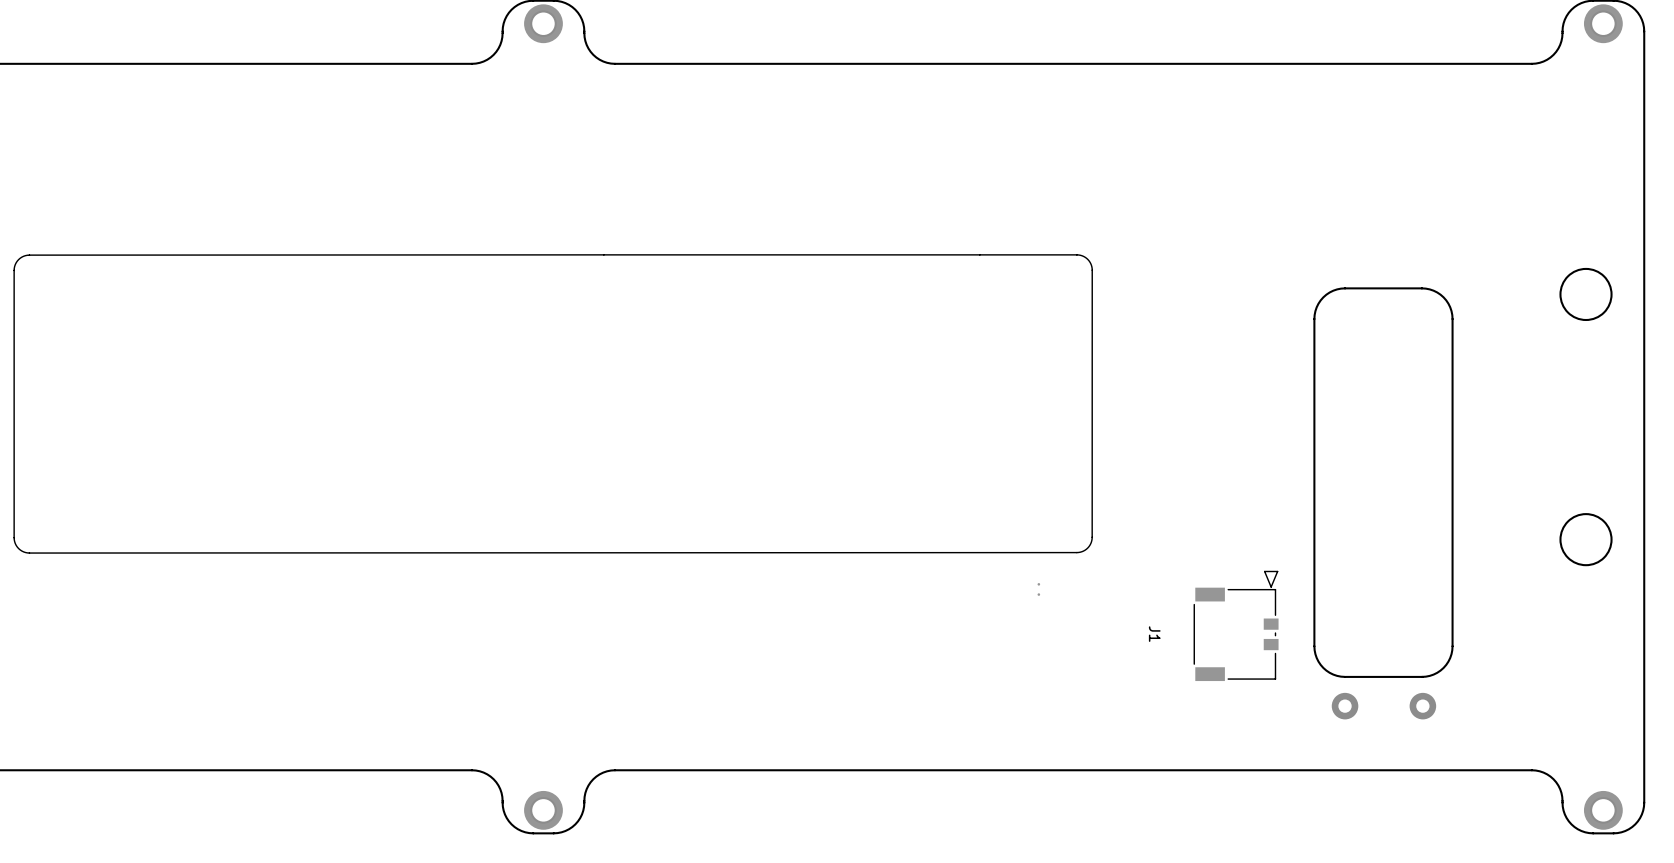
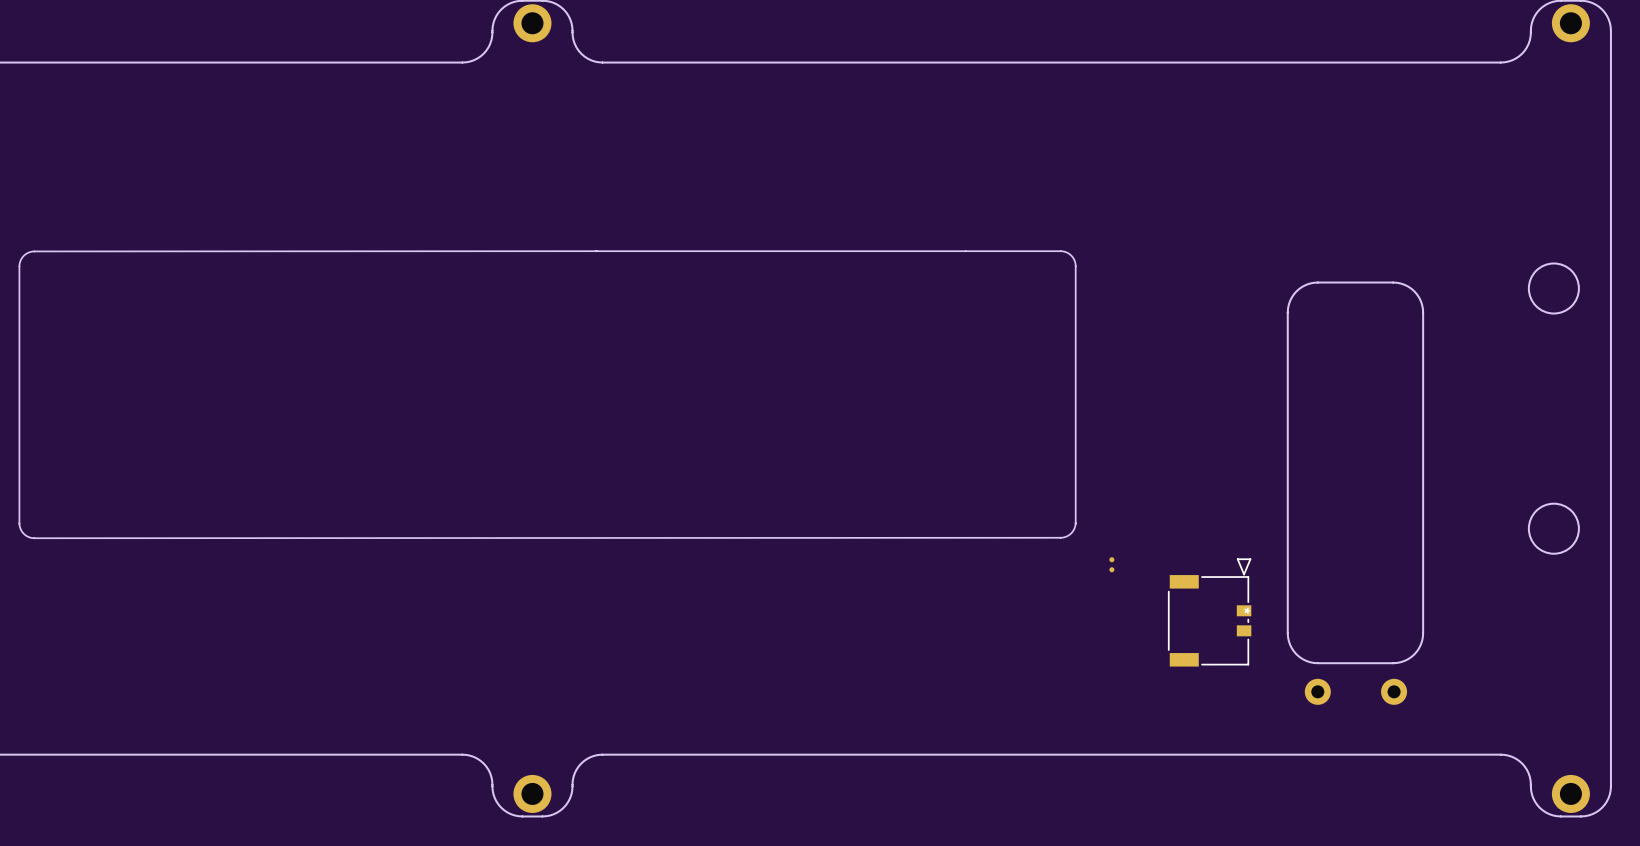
board edge: (1076, 254) (25, 255) (17, 261) (14, 270) (14, 541) (20, 549) (29, 553) (1080, 552) (1088, 546) (1092, 537) (1092, 270) (1087, 259) (1076, 254) -> none
board edge: none -> (595, 251) (1060, 251) (1068, 253) (1074, 259) (1075, 266) (1075, 524)
board edge: none -> (597, 251) (28, 252) (22, 257) (19, 266) (19, 524)
board edge: none -> (1075, 522) (1071, 533) (1060, 537) (34, 538) (23, 533) (19, 523)
part: none -> (1111, 564)
part: (1038, 589) -> none
J1 side: bottom (1236, 625) -> top (1209, 612)

